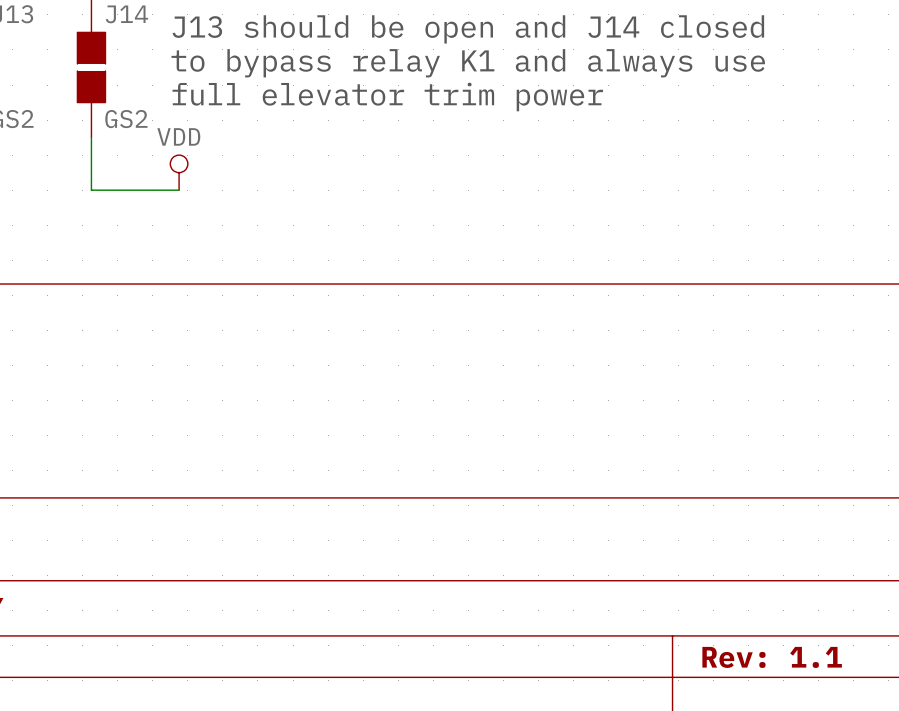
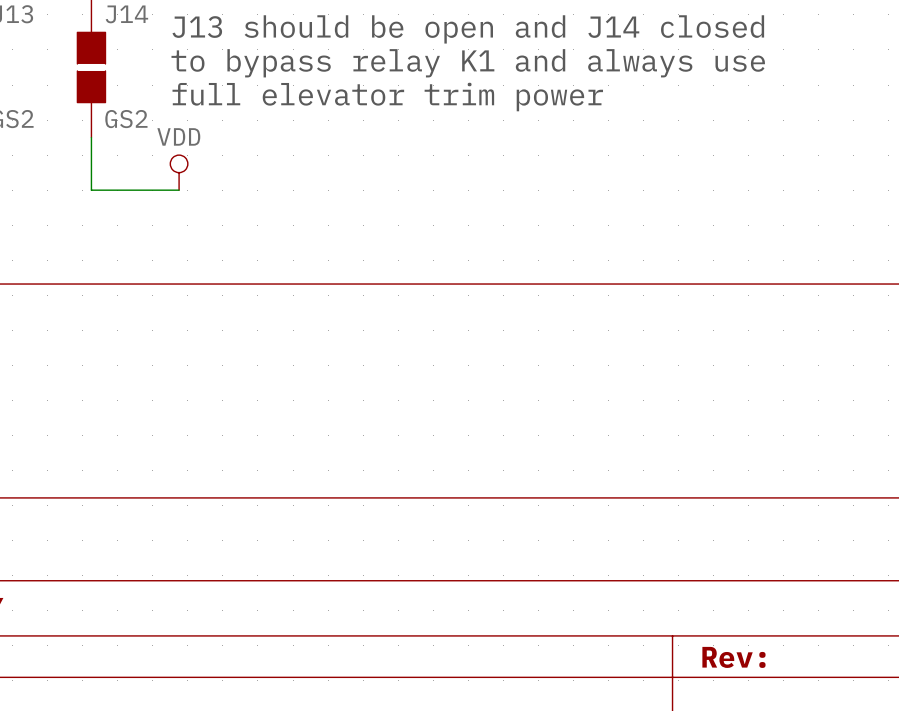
title block: Rev: 1.1 (772, 657) -> Rev: (733, 657)

